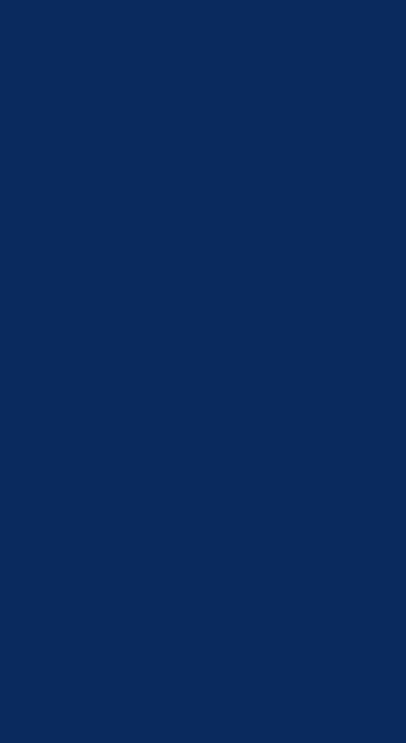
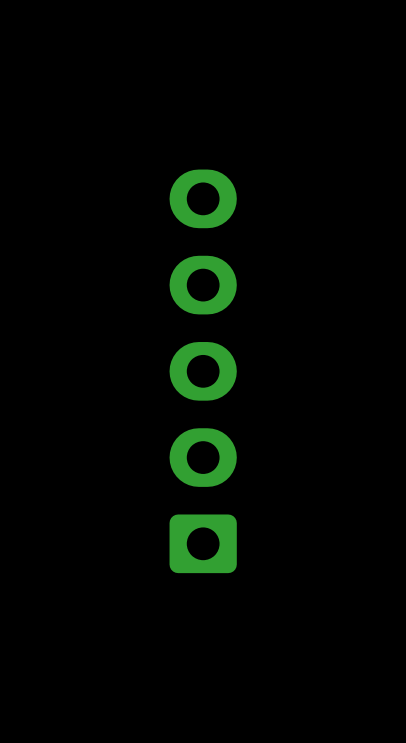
part: none -> (203, 371)

